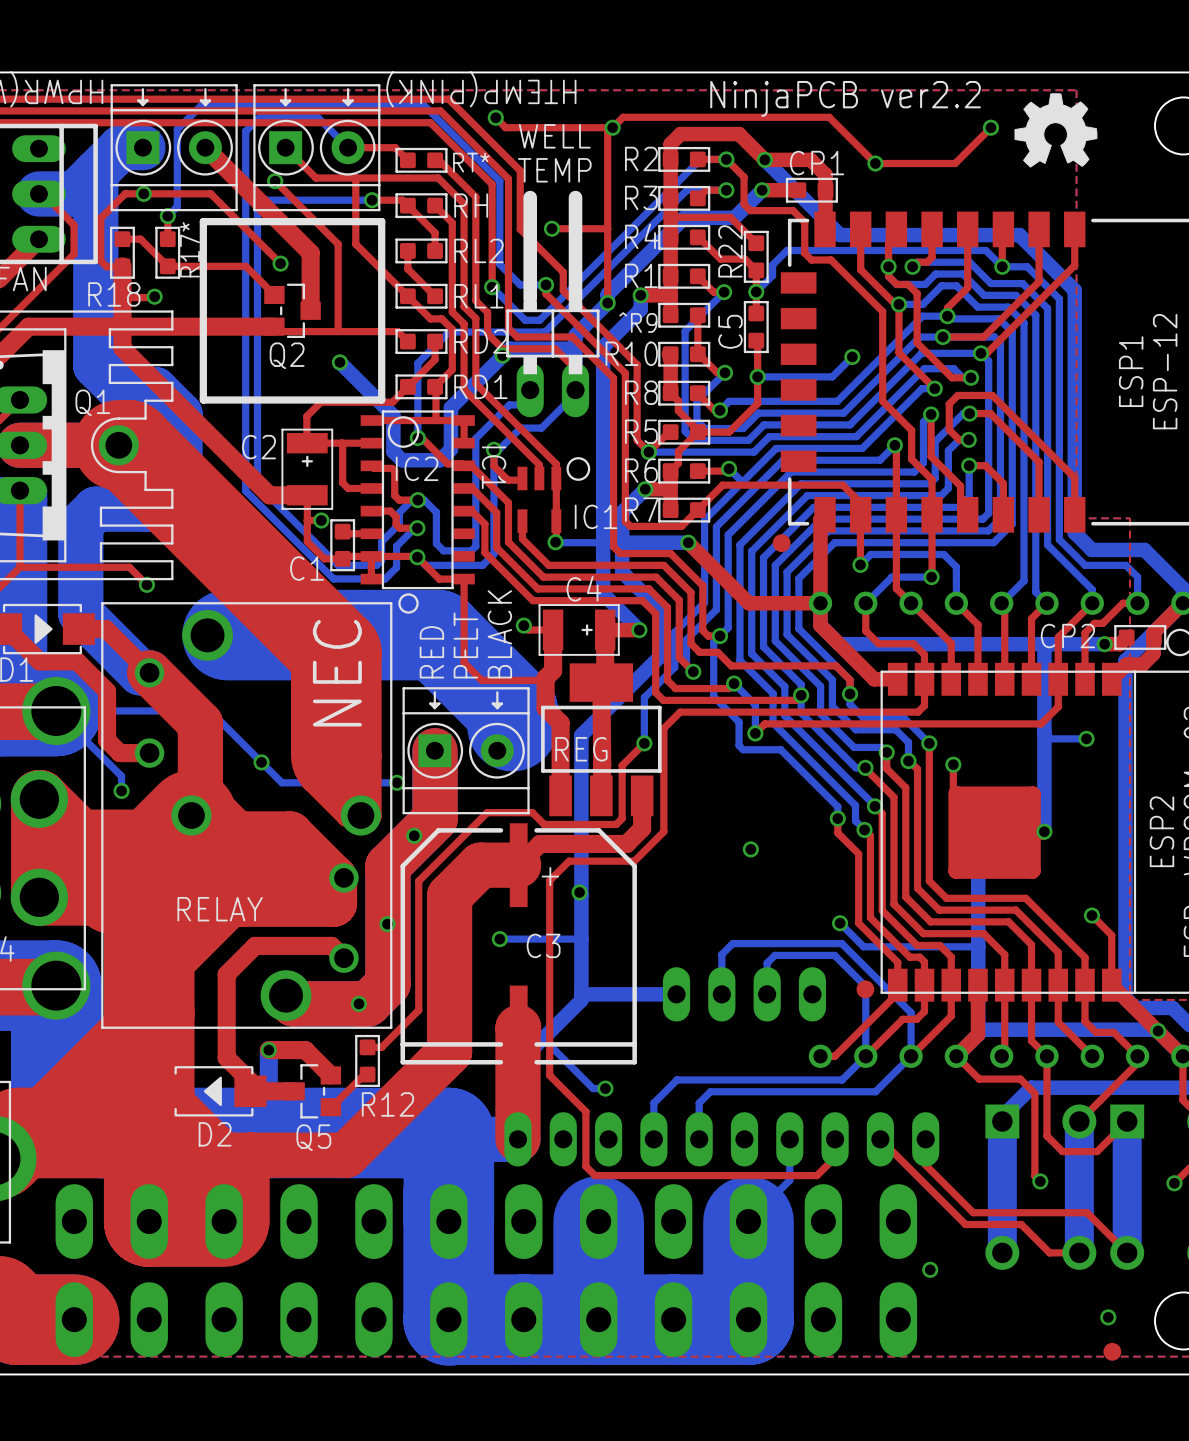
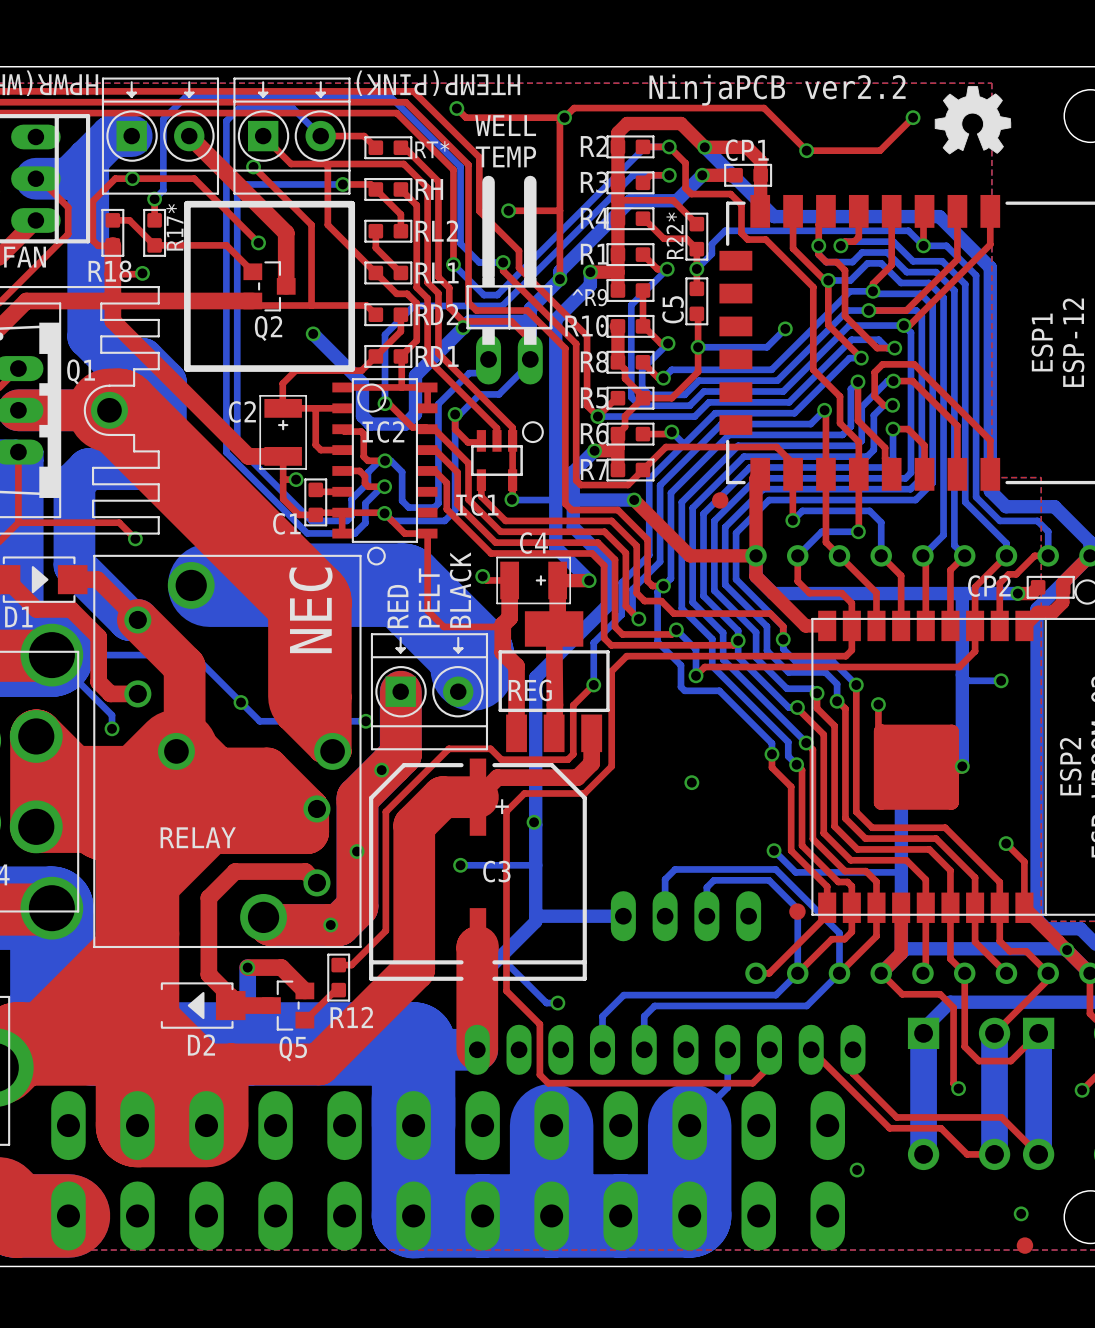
text: R22 (730, 251) -> R22* (674, 235)
part: none -> (507, 456)
IC1: (553, 494) -> none
text position: IC1 (596, 516) -> IC1 (477, 505)

